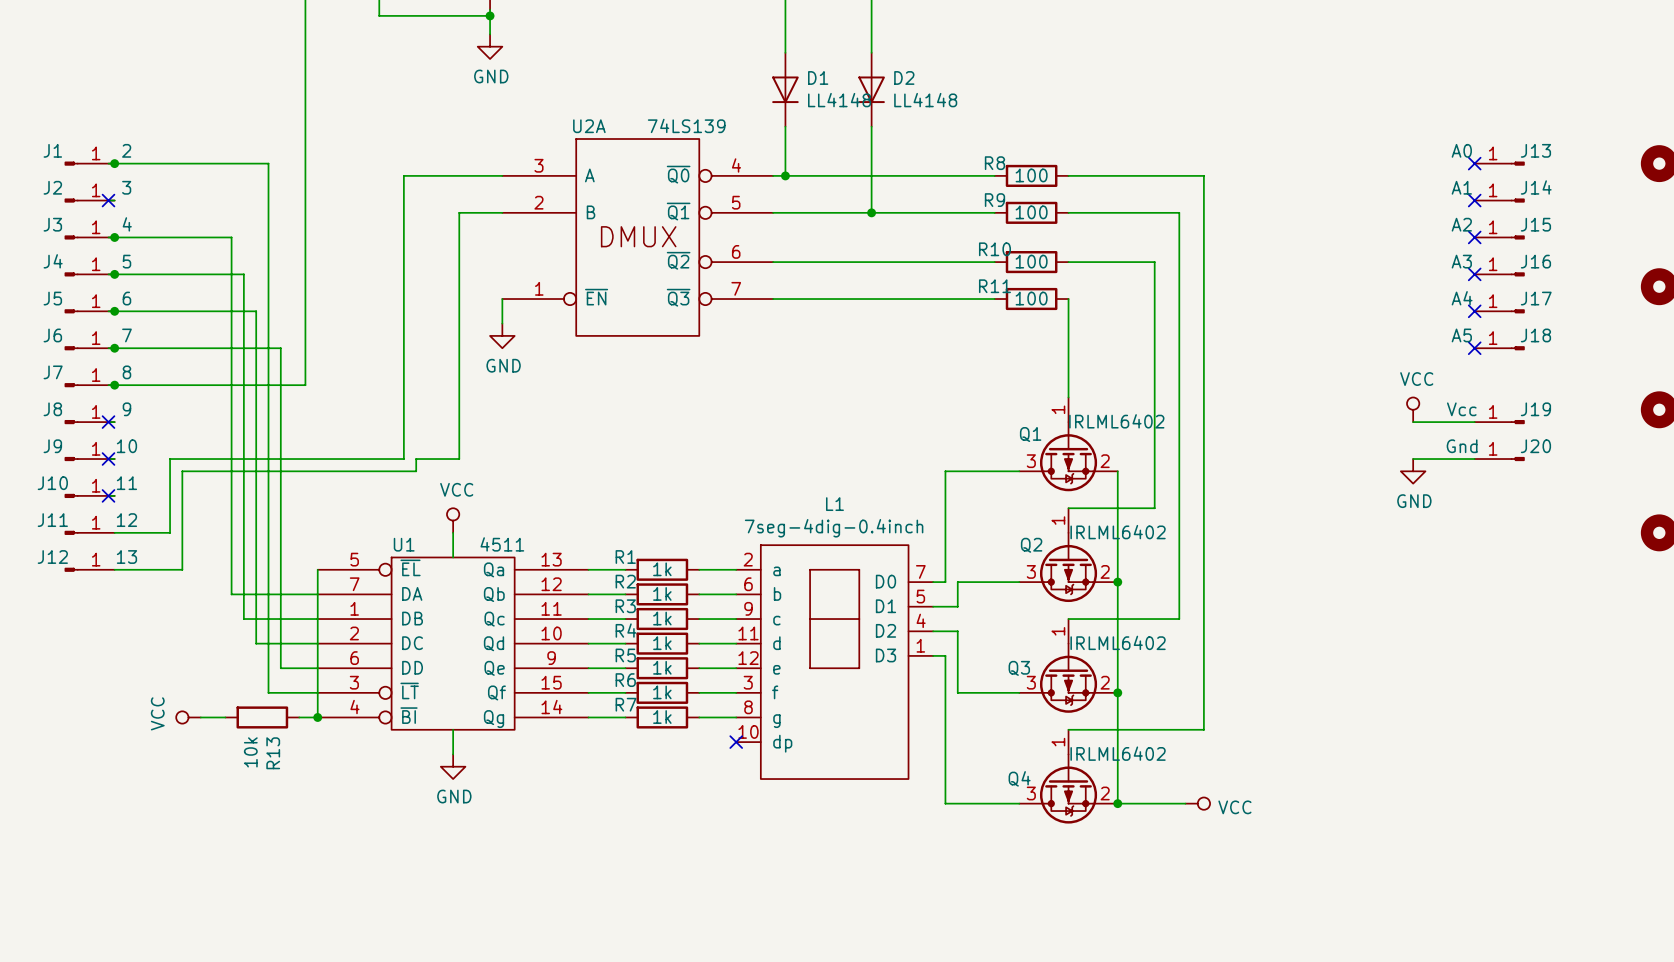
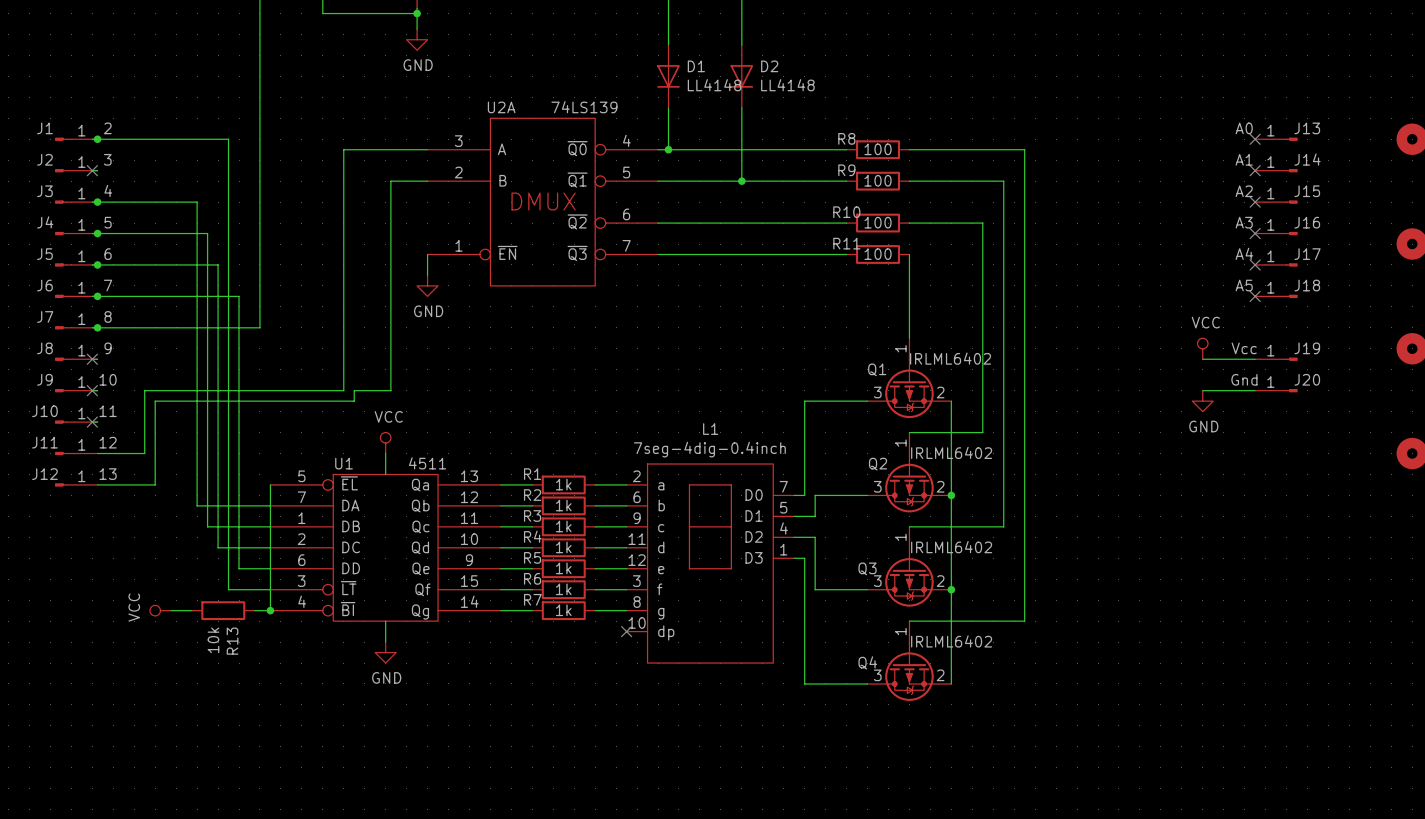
wire: (1117, 803) (1185, 803) -> none
junction: (1117, 803) -> none
power symbol: VCC (1197, 803) -> none

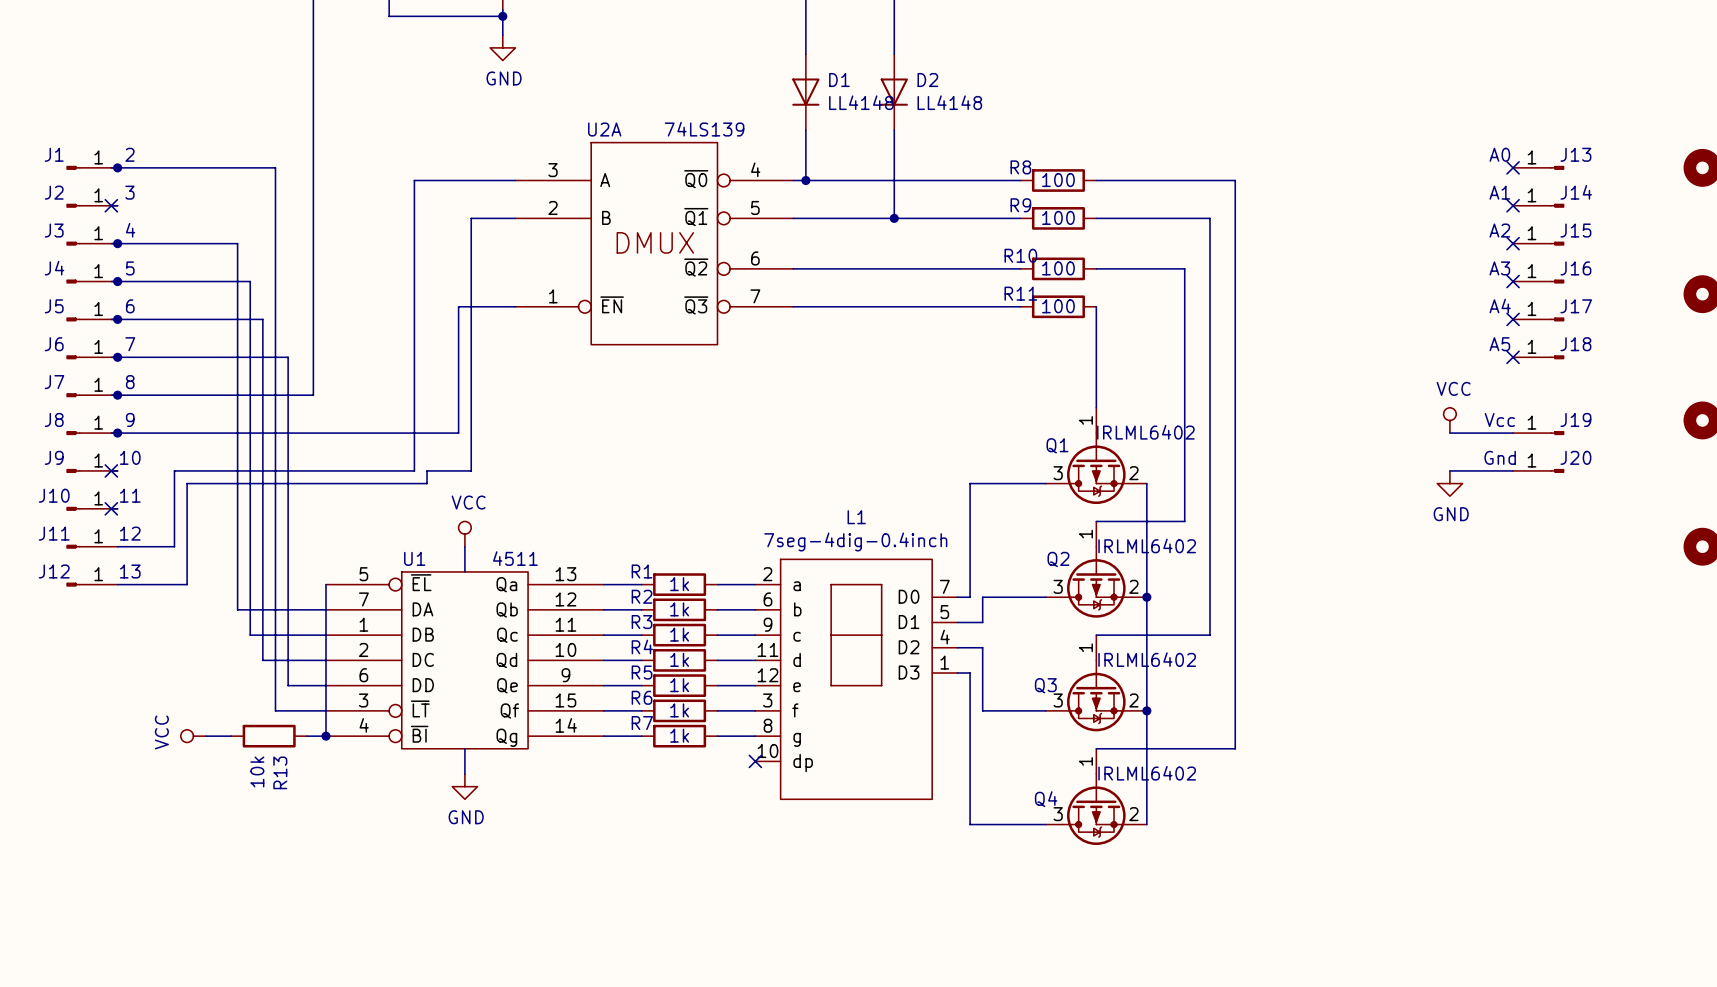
wire: (427, 254) (427, 275) -> (515, 306) (458, 306) (458, 433) (117, 433)
power symbol: GND (427, 285) -> none
no-connect mark: (92, 359) -> none
junction: none -> (117, 433)

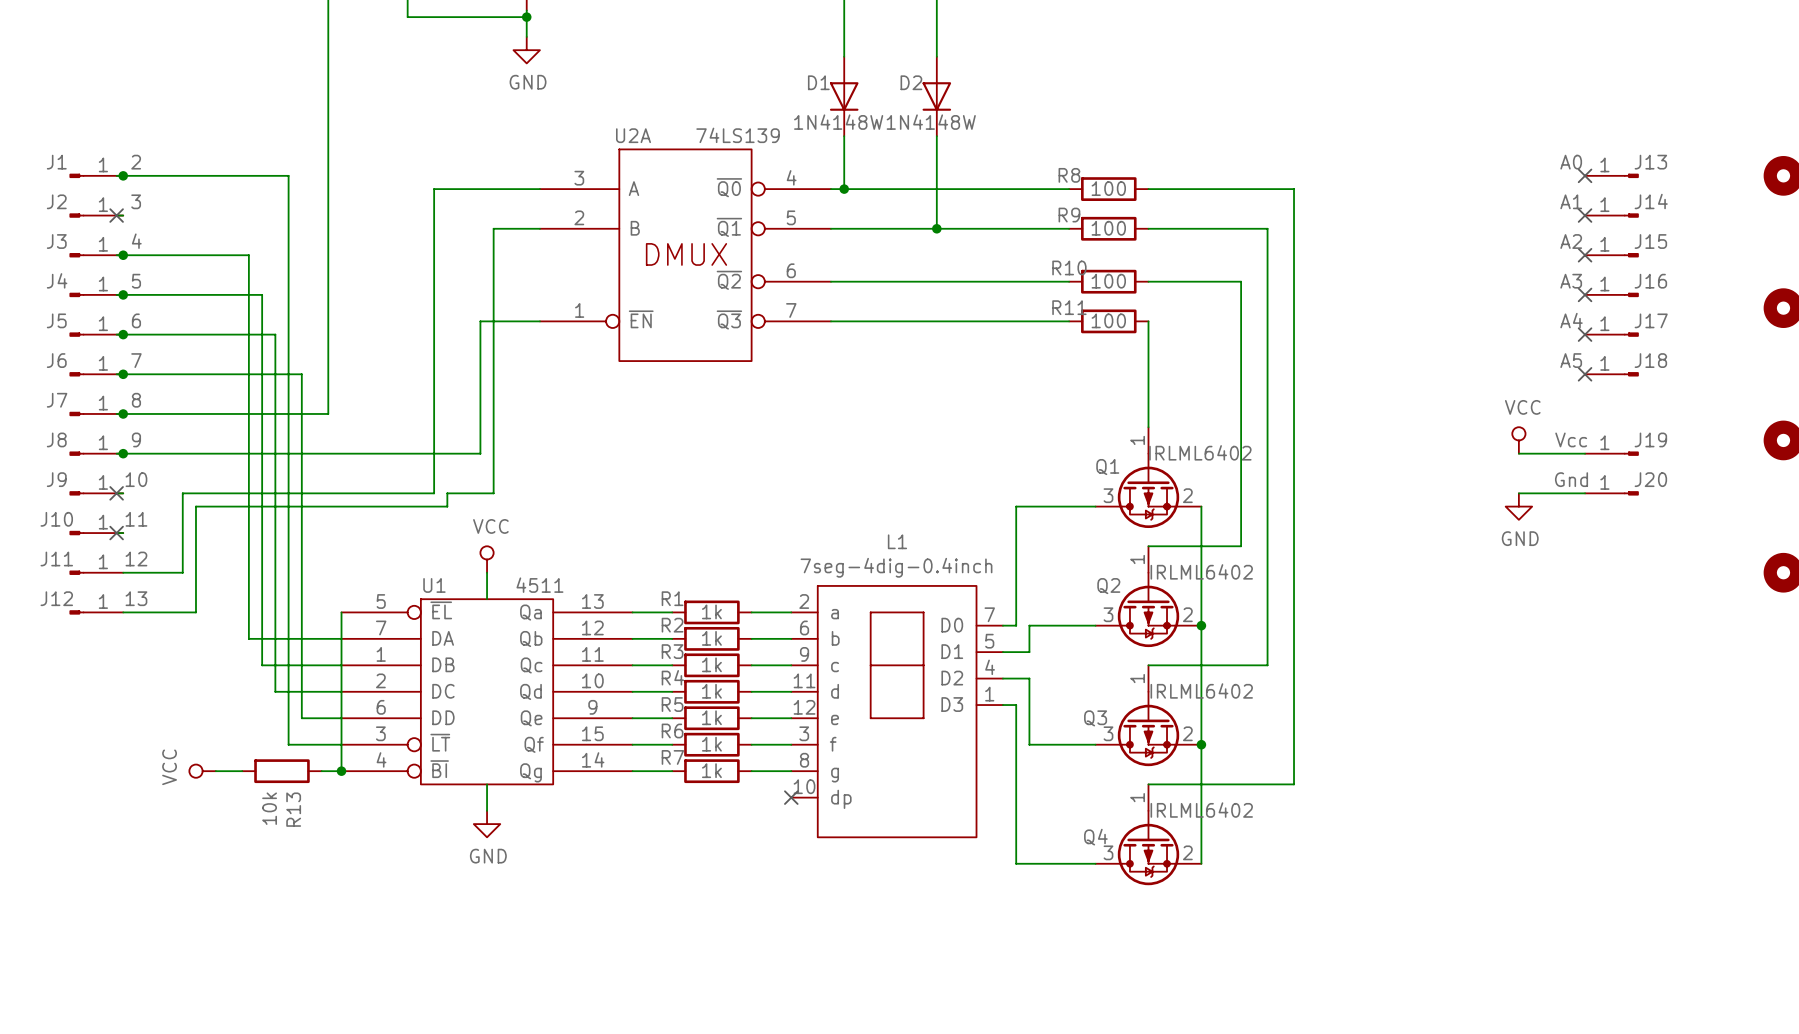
D1 name position: D1 (839, 80) -> D1 (818, 82)
D2 name position: D2 (927, 80) -> D2 (911, 82)
D1 value: LL4148 (861, 102) -> 1N4148W (838, 122)
D2 value: LL4148 (949, 102) -> 1N4148W (931, 122)

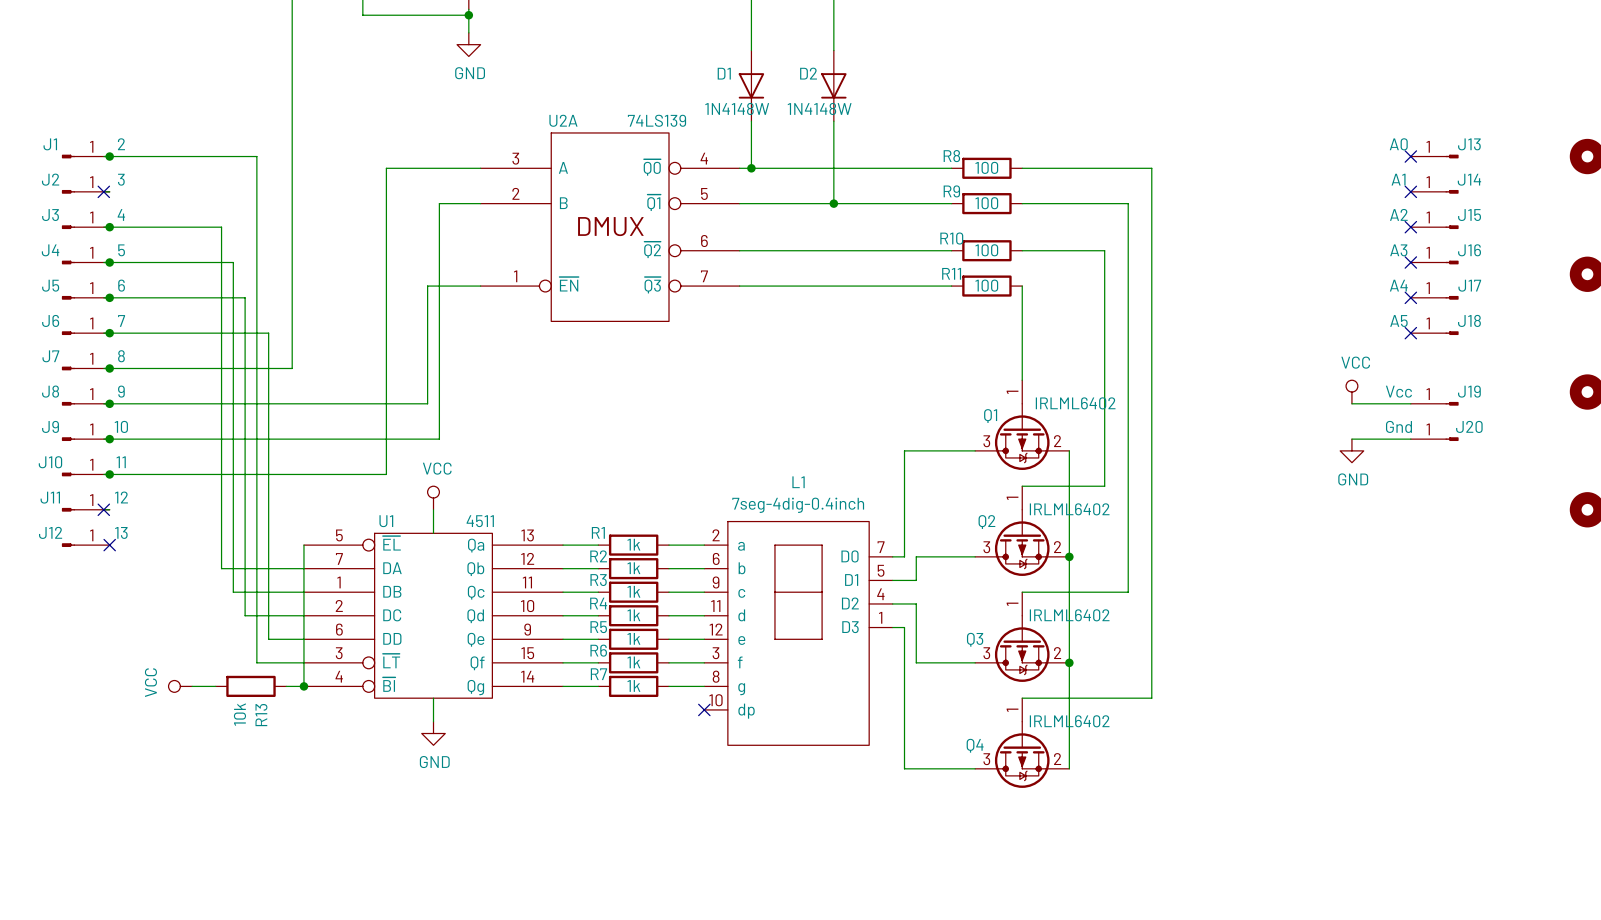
no-connect mark: (116, 493) -> none
junction: none -> (109, 439)
wire: (182, 493) (182, 572) (123, 572) -> (162, 439) (109, 439)
wire: (447, 493) (447, 506) (195, 506) (195, 612) (123, 612) -> (398, 439) (386, 439) (386, 474) (109, 474)
no-connect mark: (116, 533) -> none
junction: none -> (109, 474)
no-connect mark: none -> (103, 509)
no-connect mark: none -> (109, 545)

